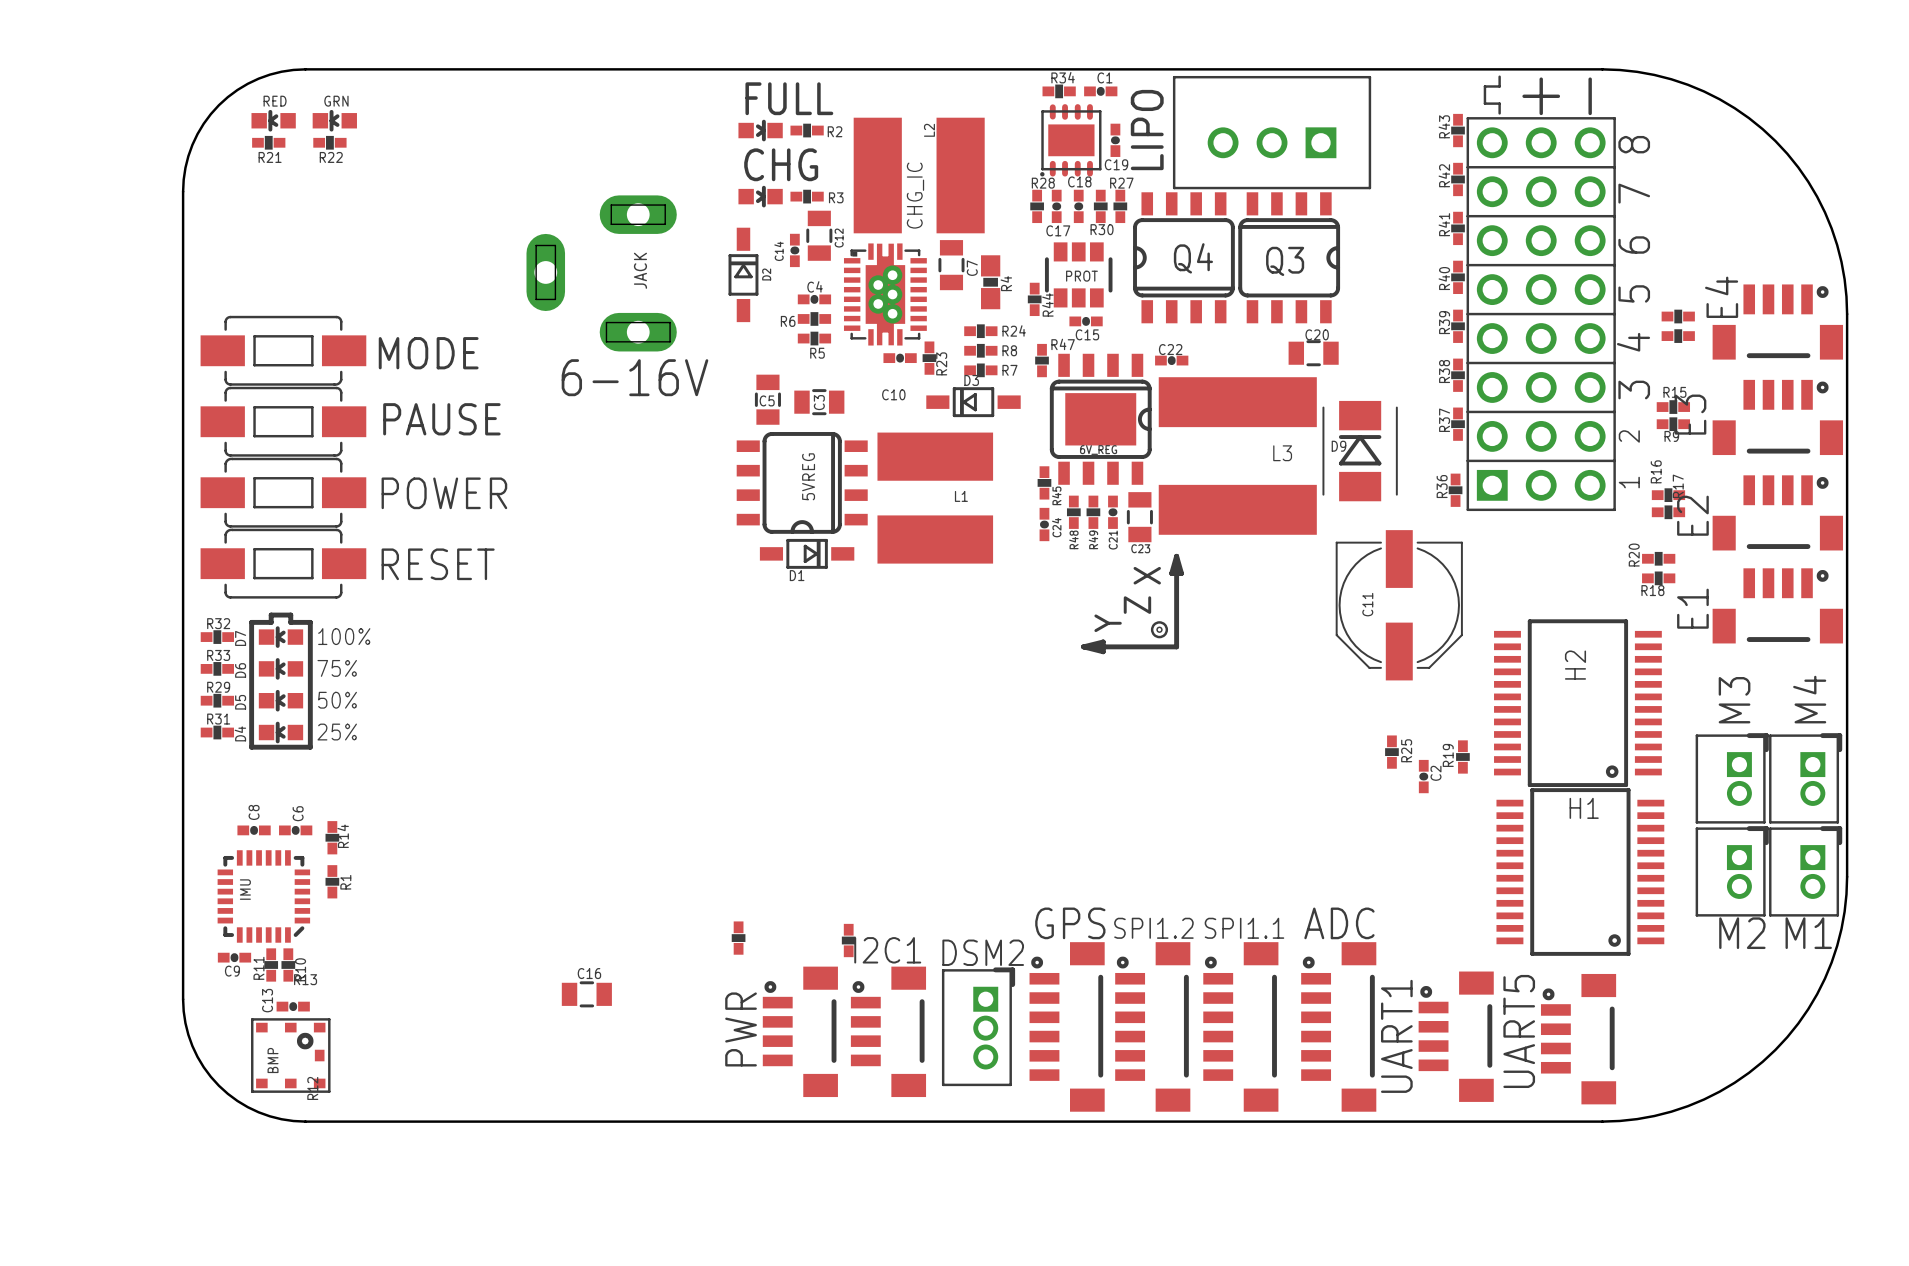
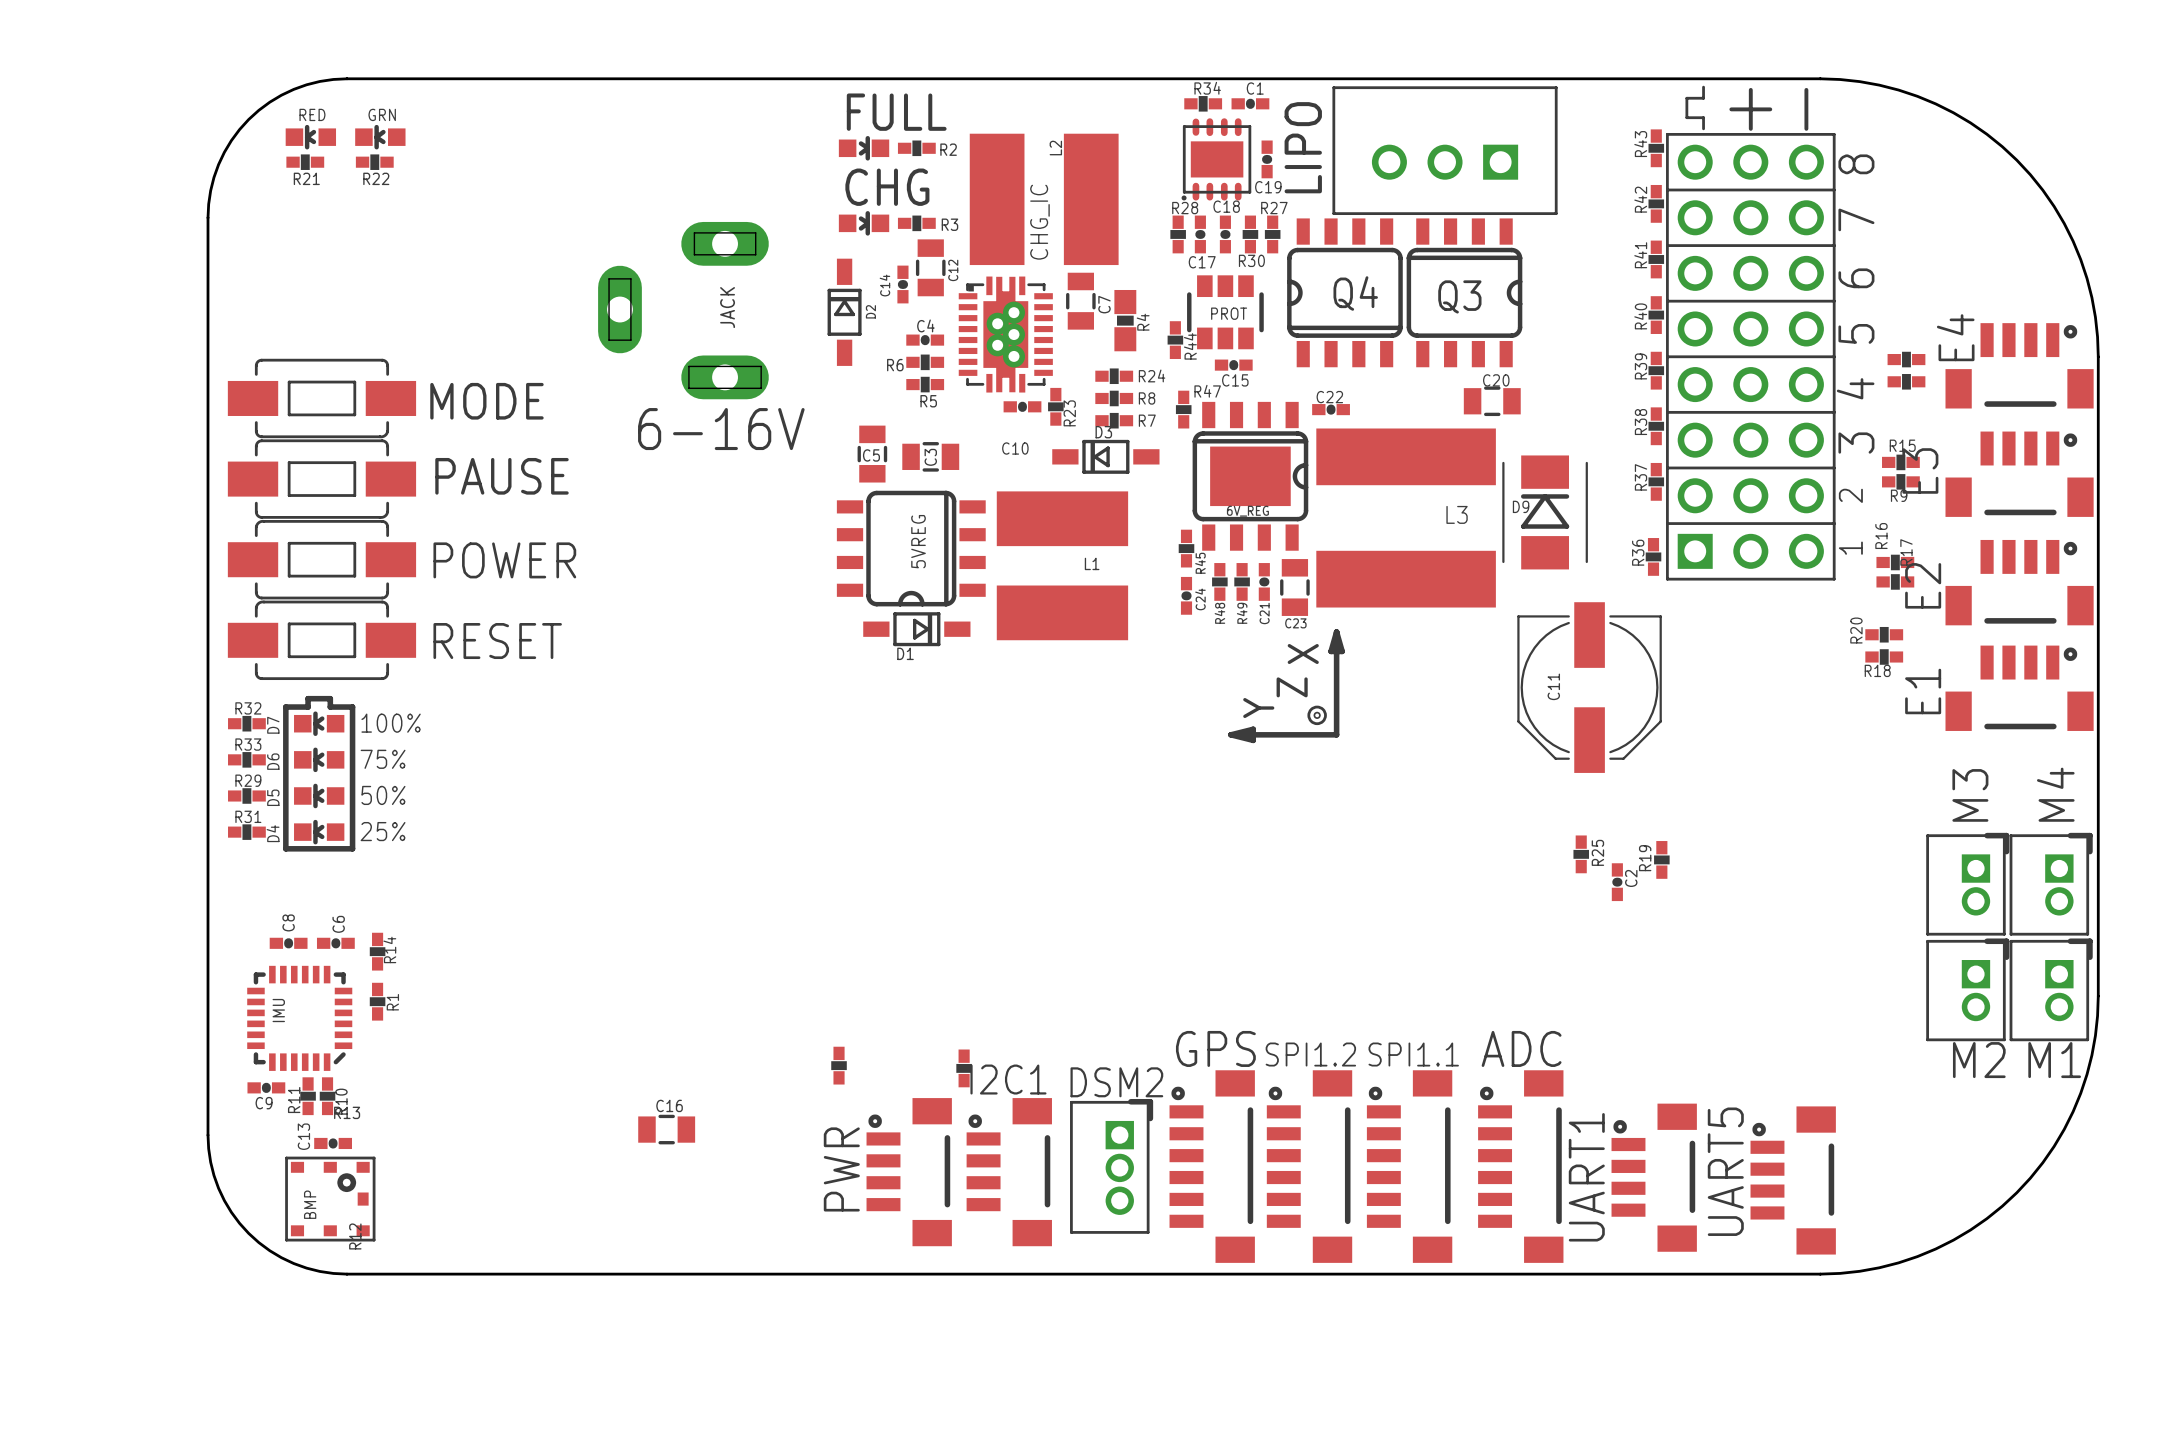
H2: (1577, 703) -> none
H1: (1580, 872) -> none

